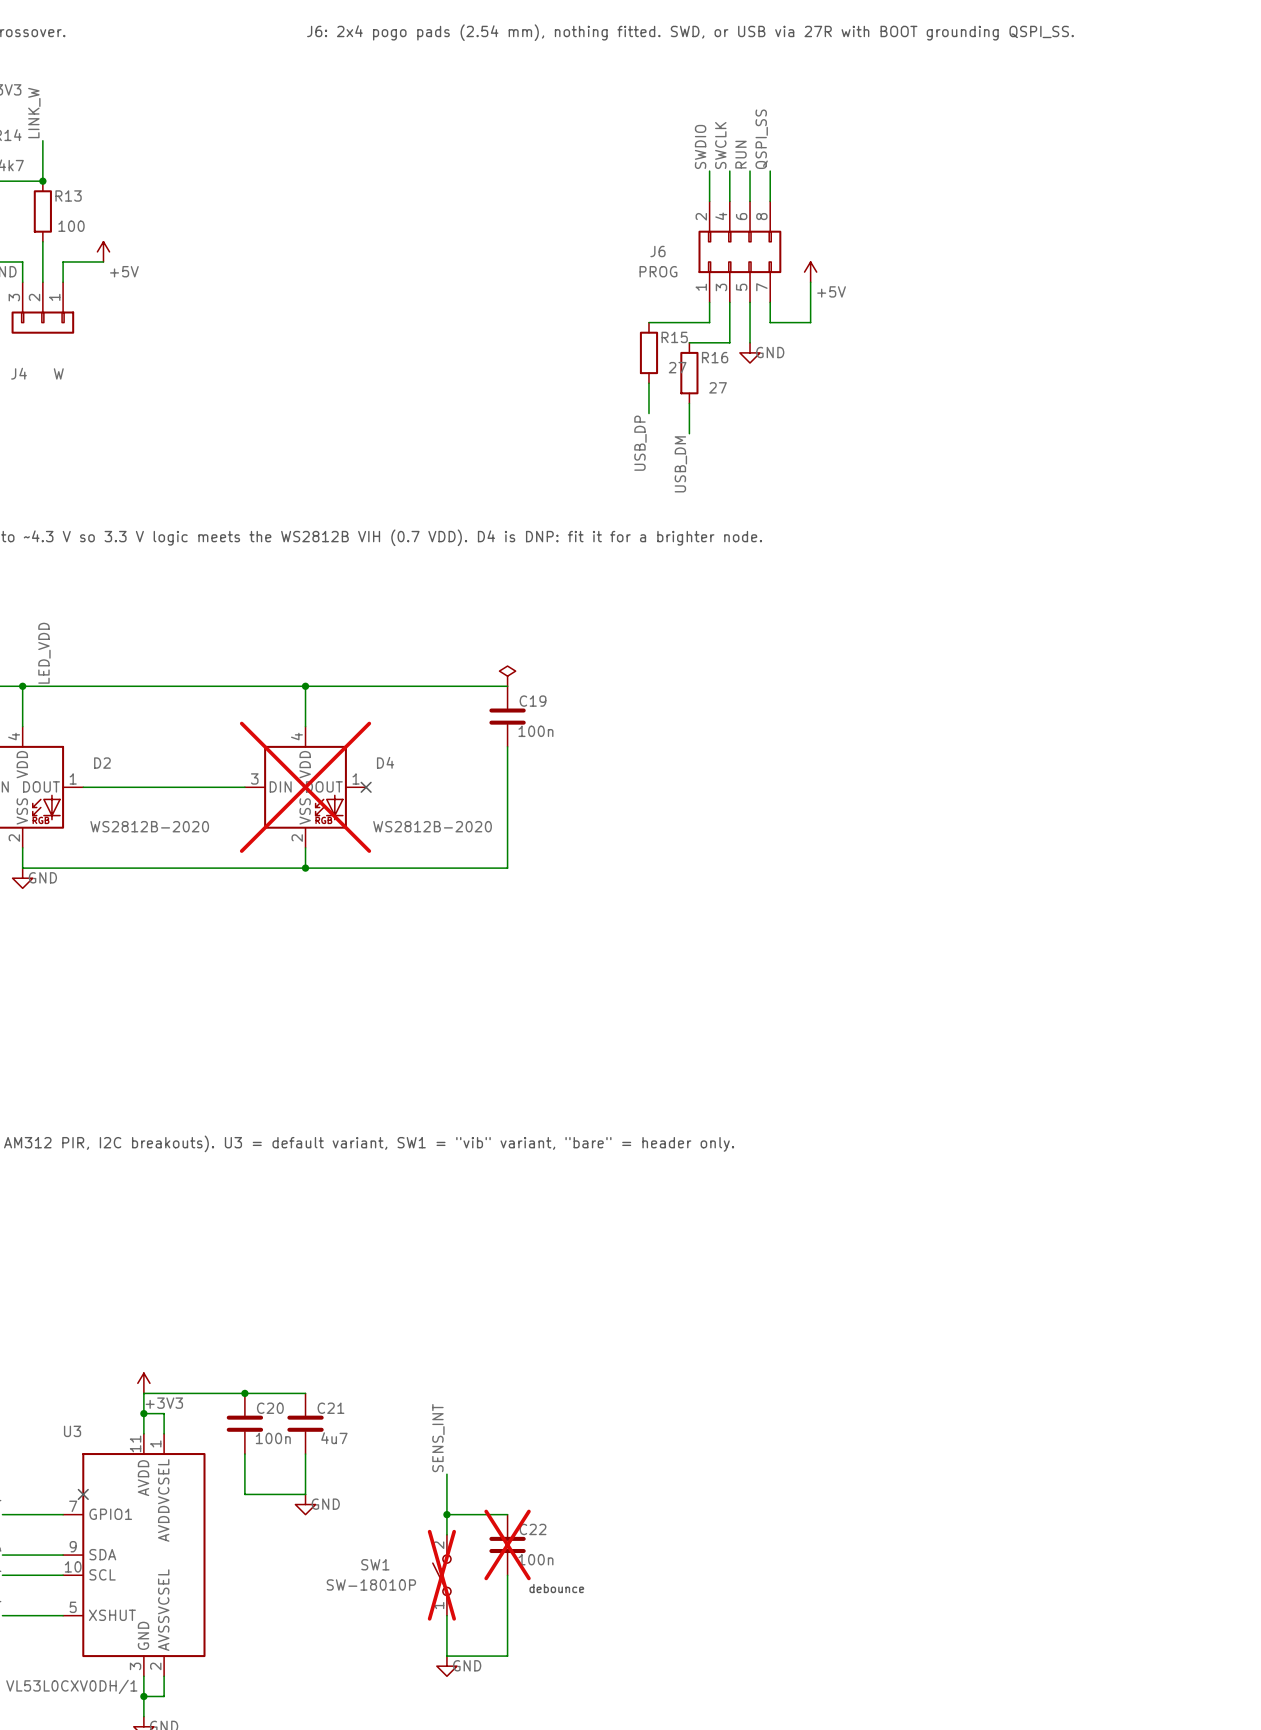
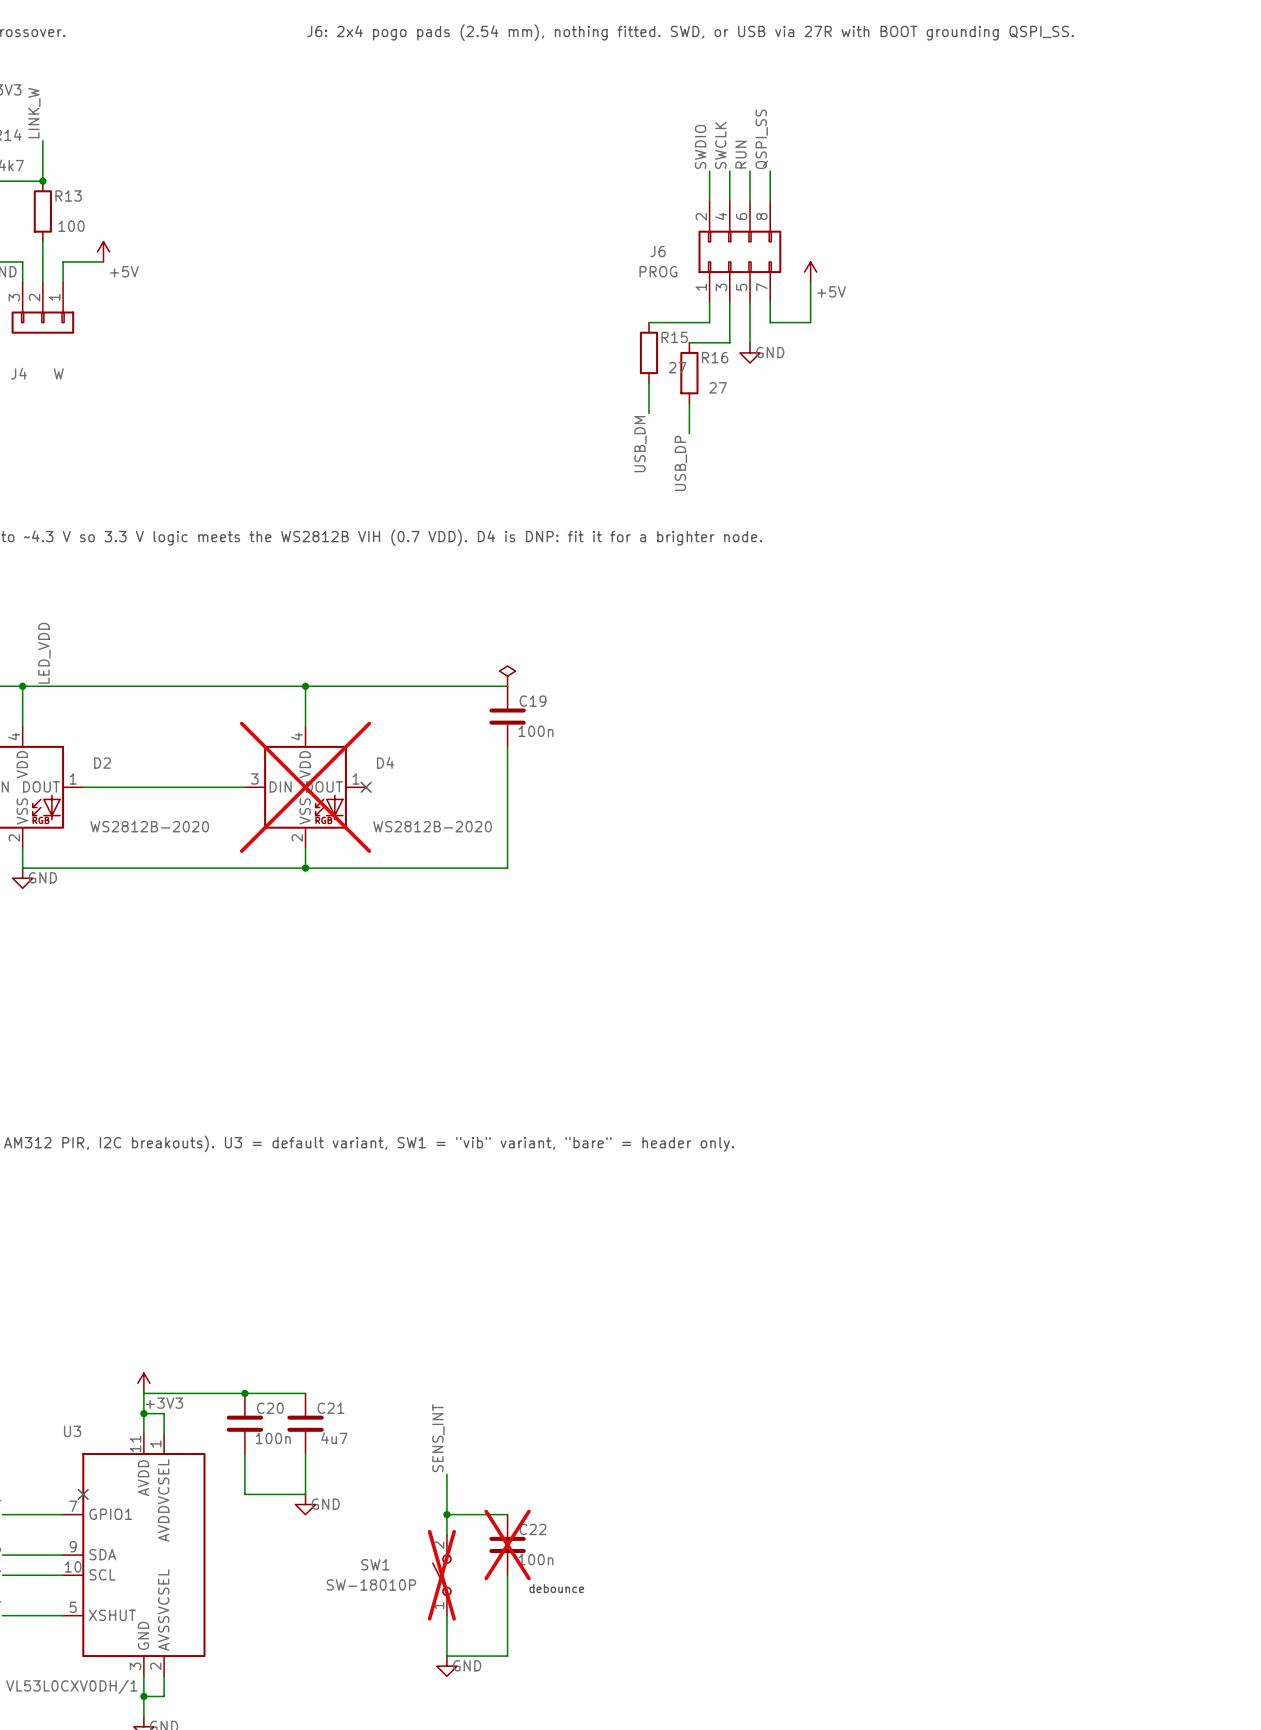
label: USB_DP (640, 443) -> USB_DM (640, 444)
label: USB_DM (680, 464) -> USB_DP (680, 463)

